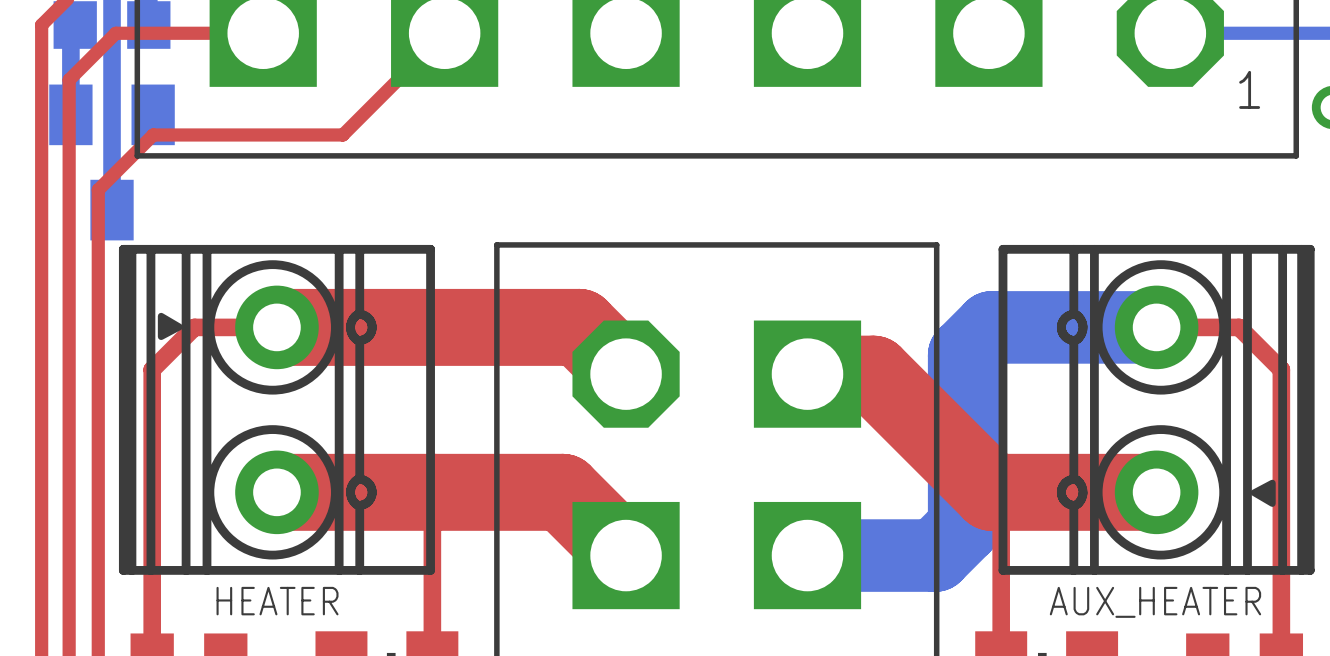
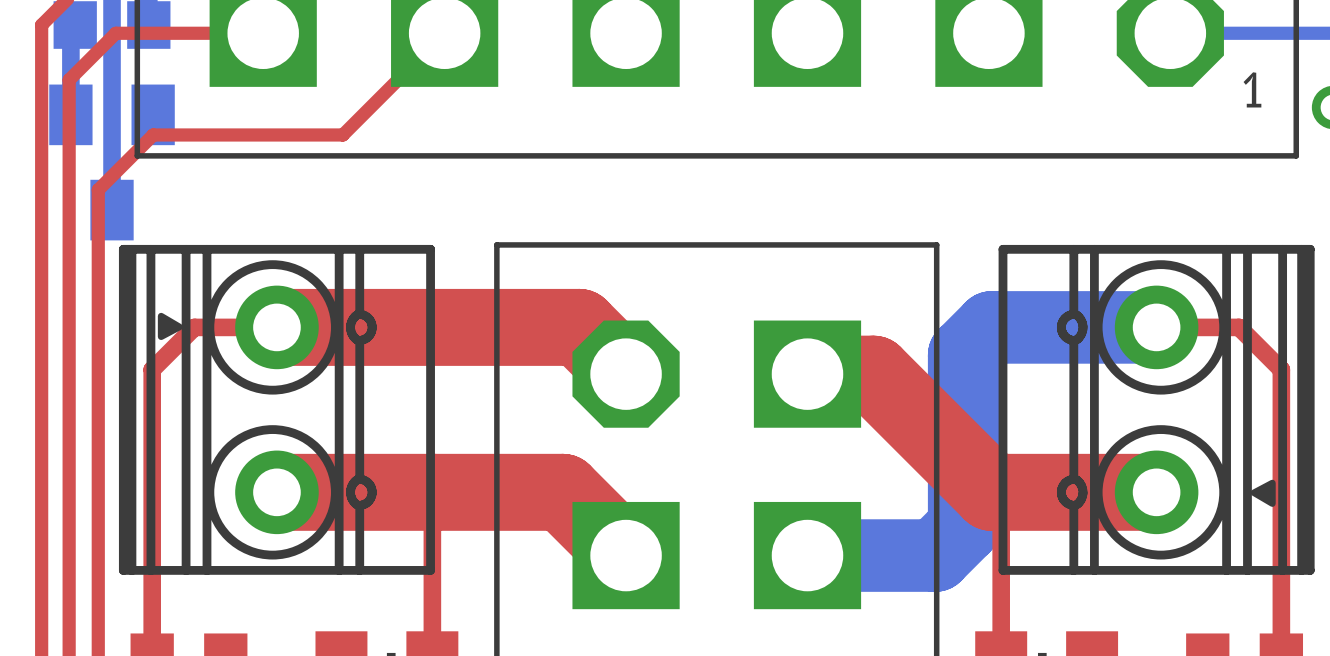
text: HEATER (277, 601) -> none
text: AUX_HEATER (1155, 602) -> none

